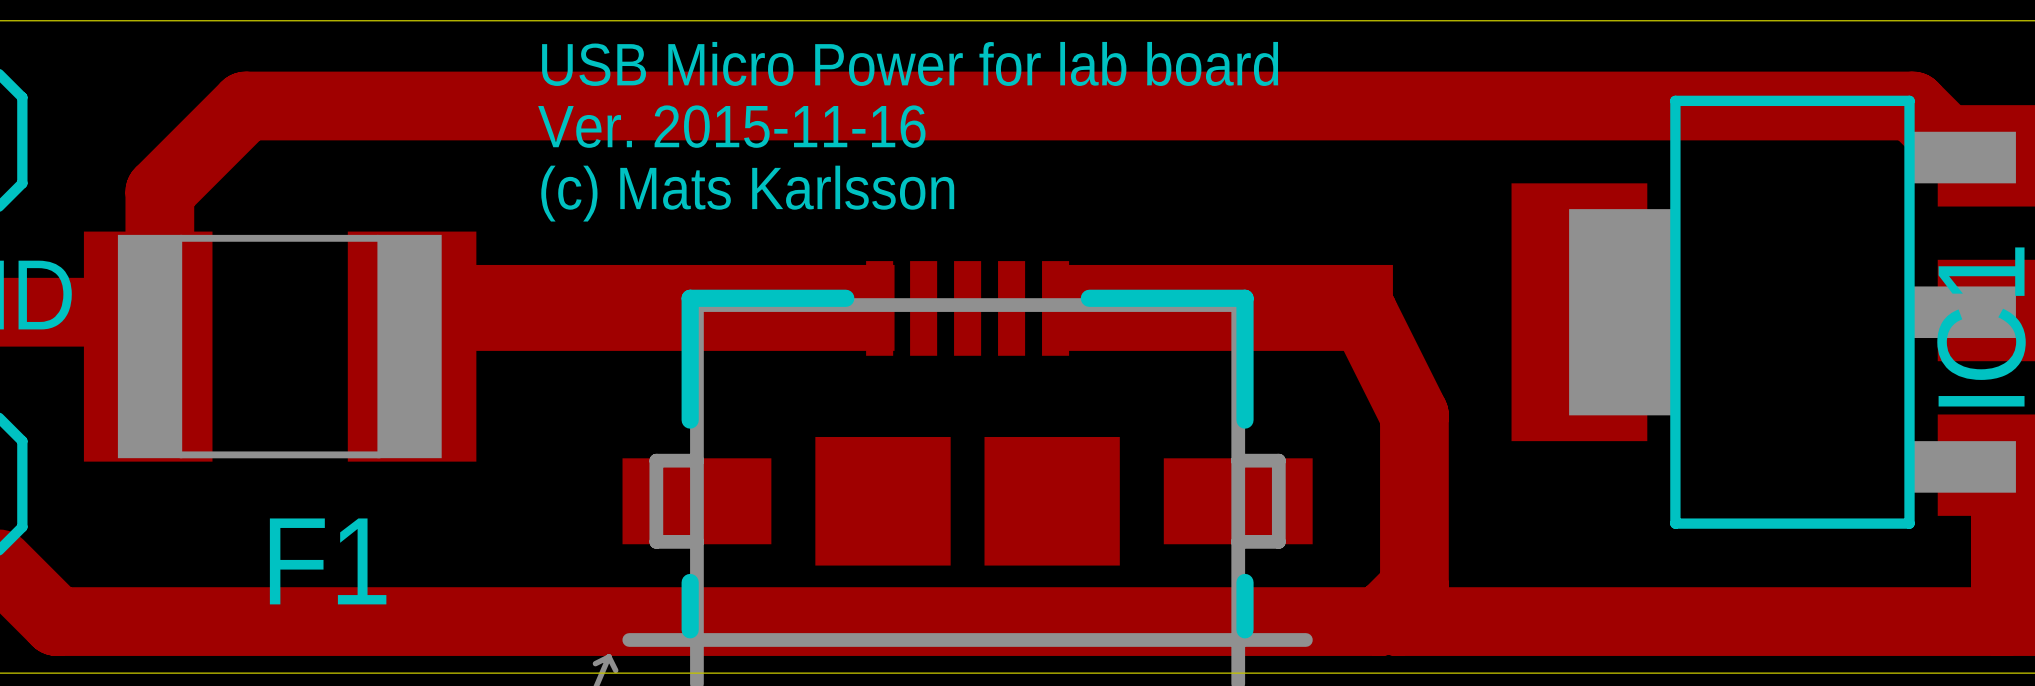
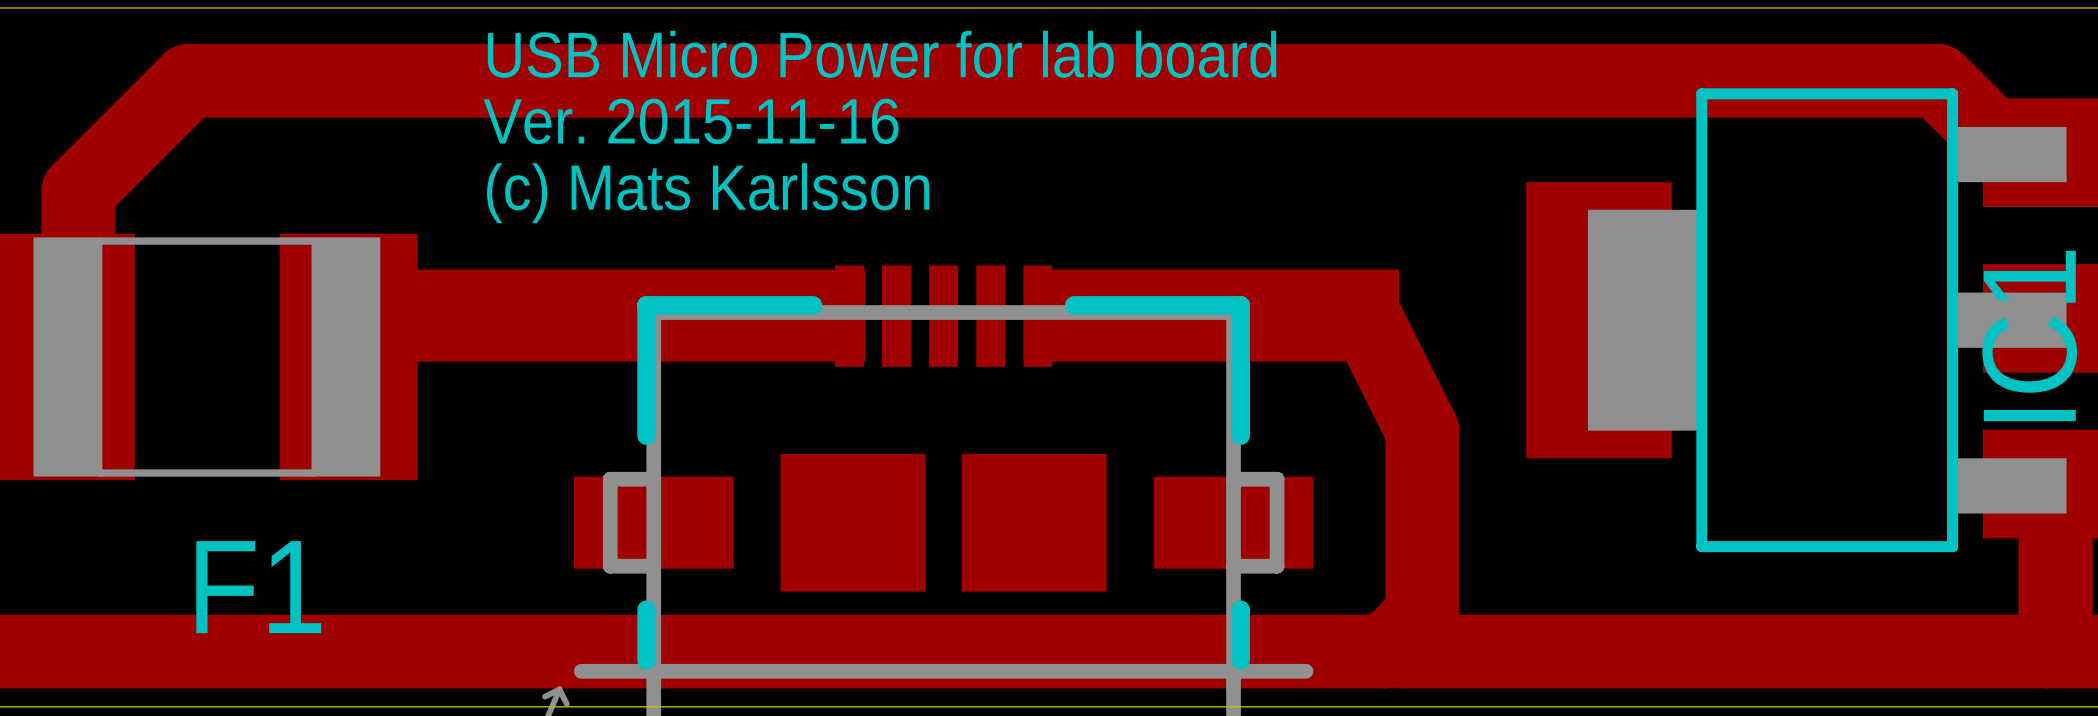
track: (245, 106) (1912, 106) -> (170, 99) (188, 80) (1937, 80) (1956, 99)

